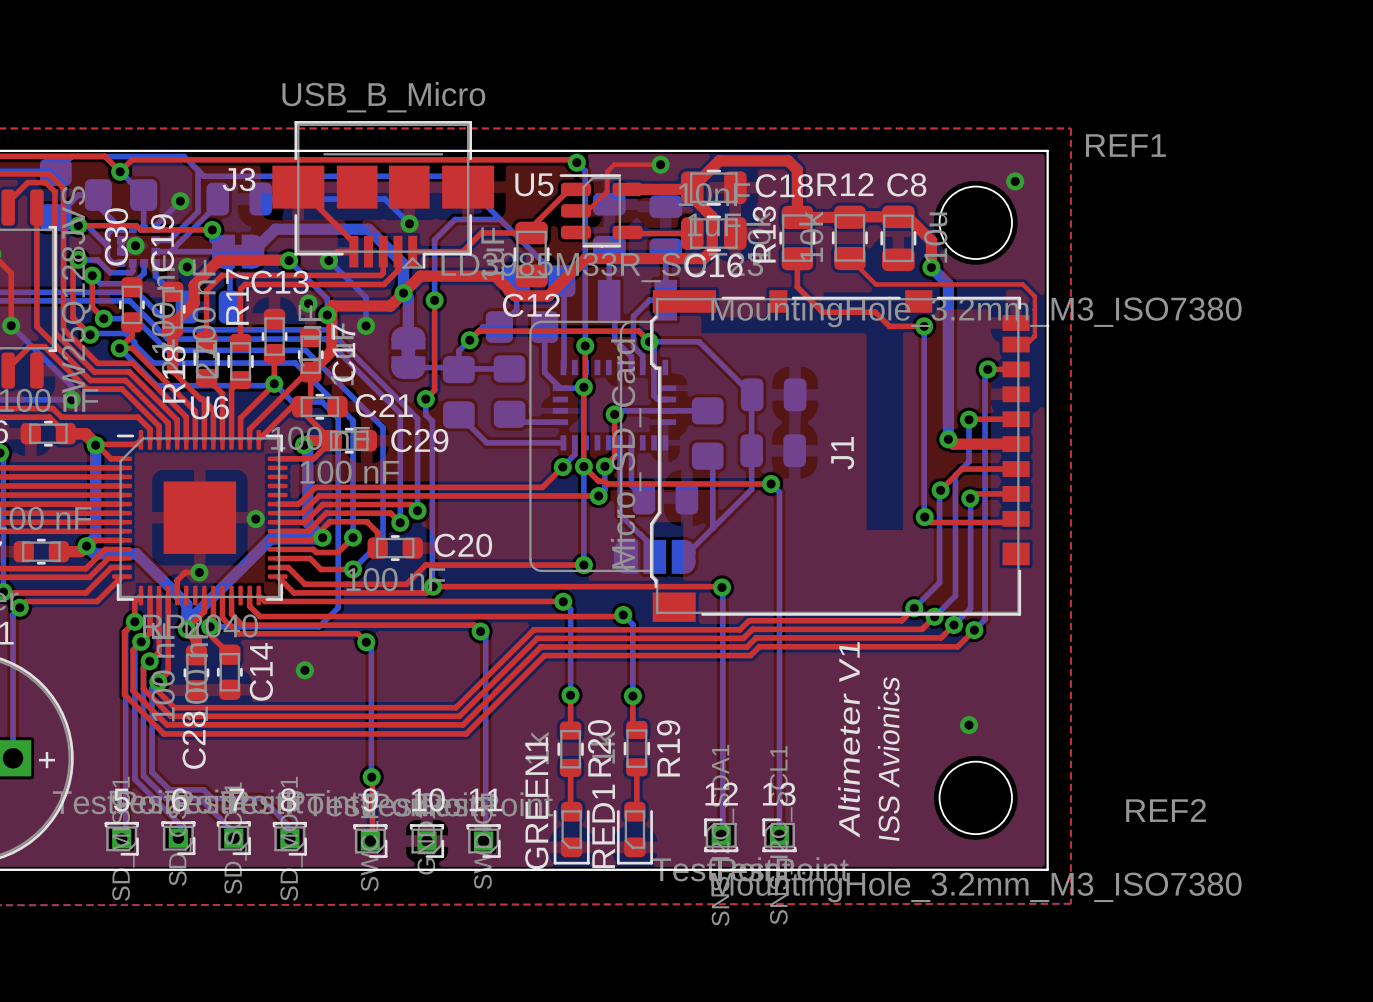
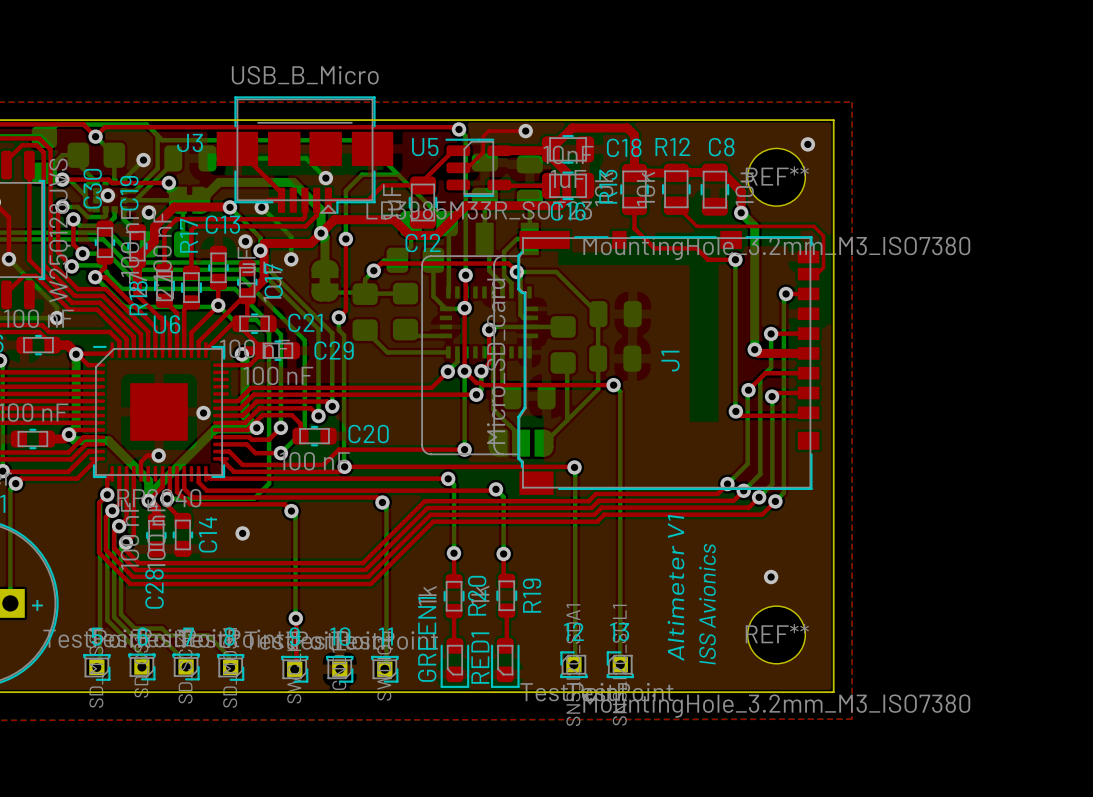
REF** text: REF1 (1125, 145) -> none
REF** name: none -> REF** (777, 176)
REF** name: none -> REF** (777, 633)
REF** text: REF2 (1166, 810) -> none

